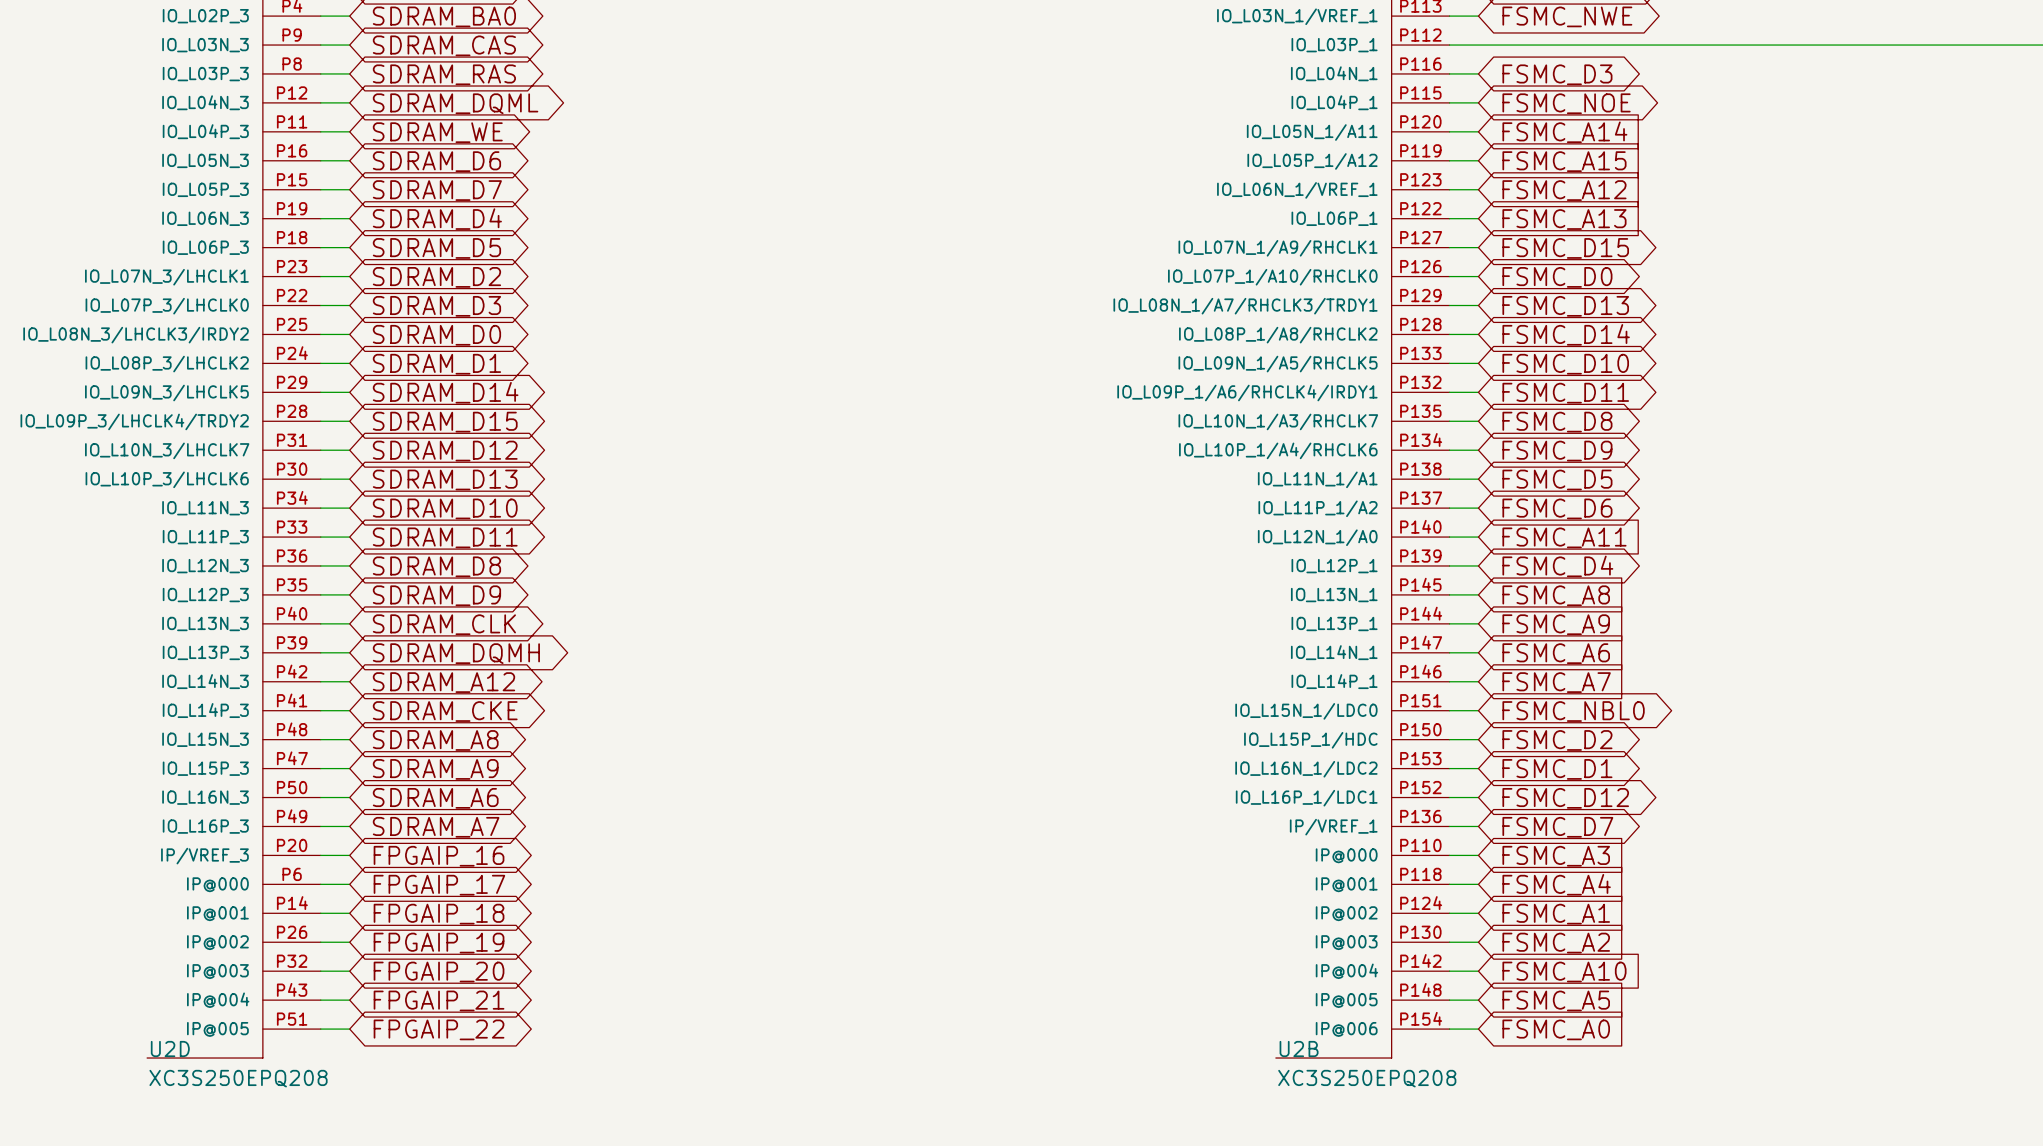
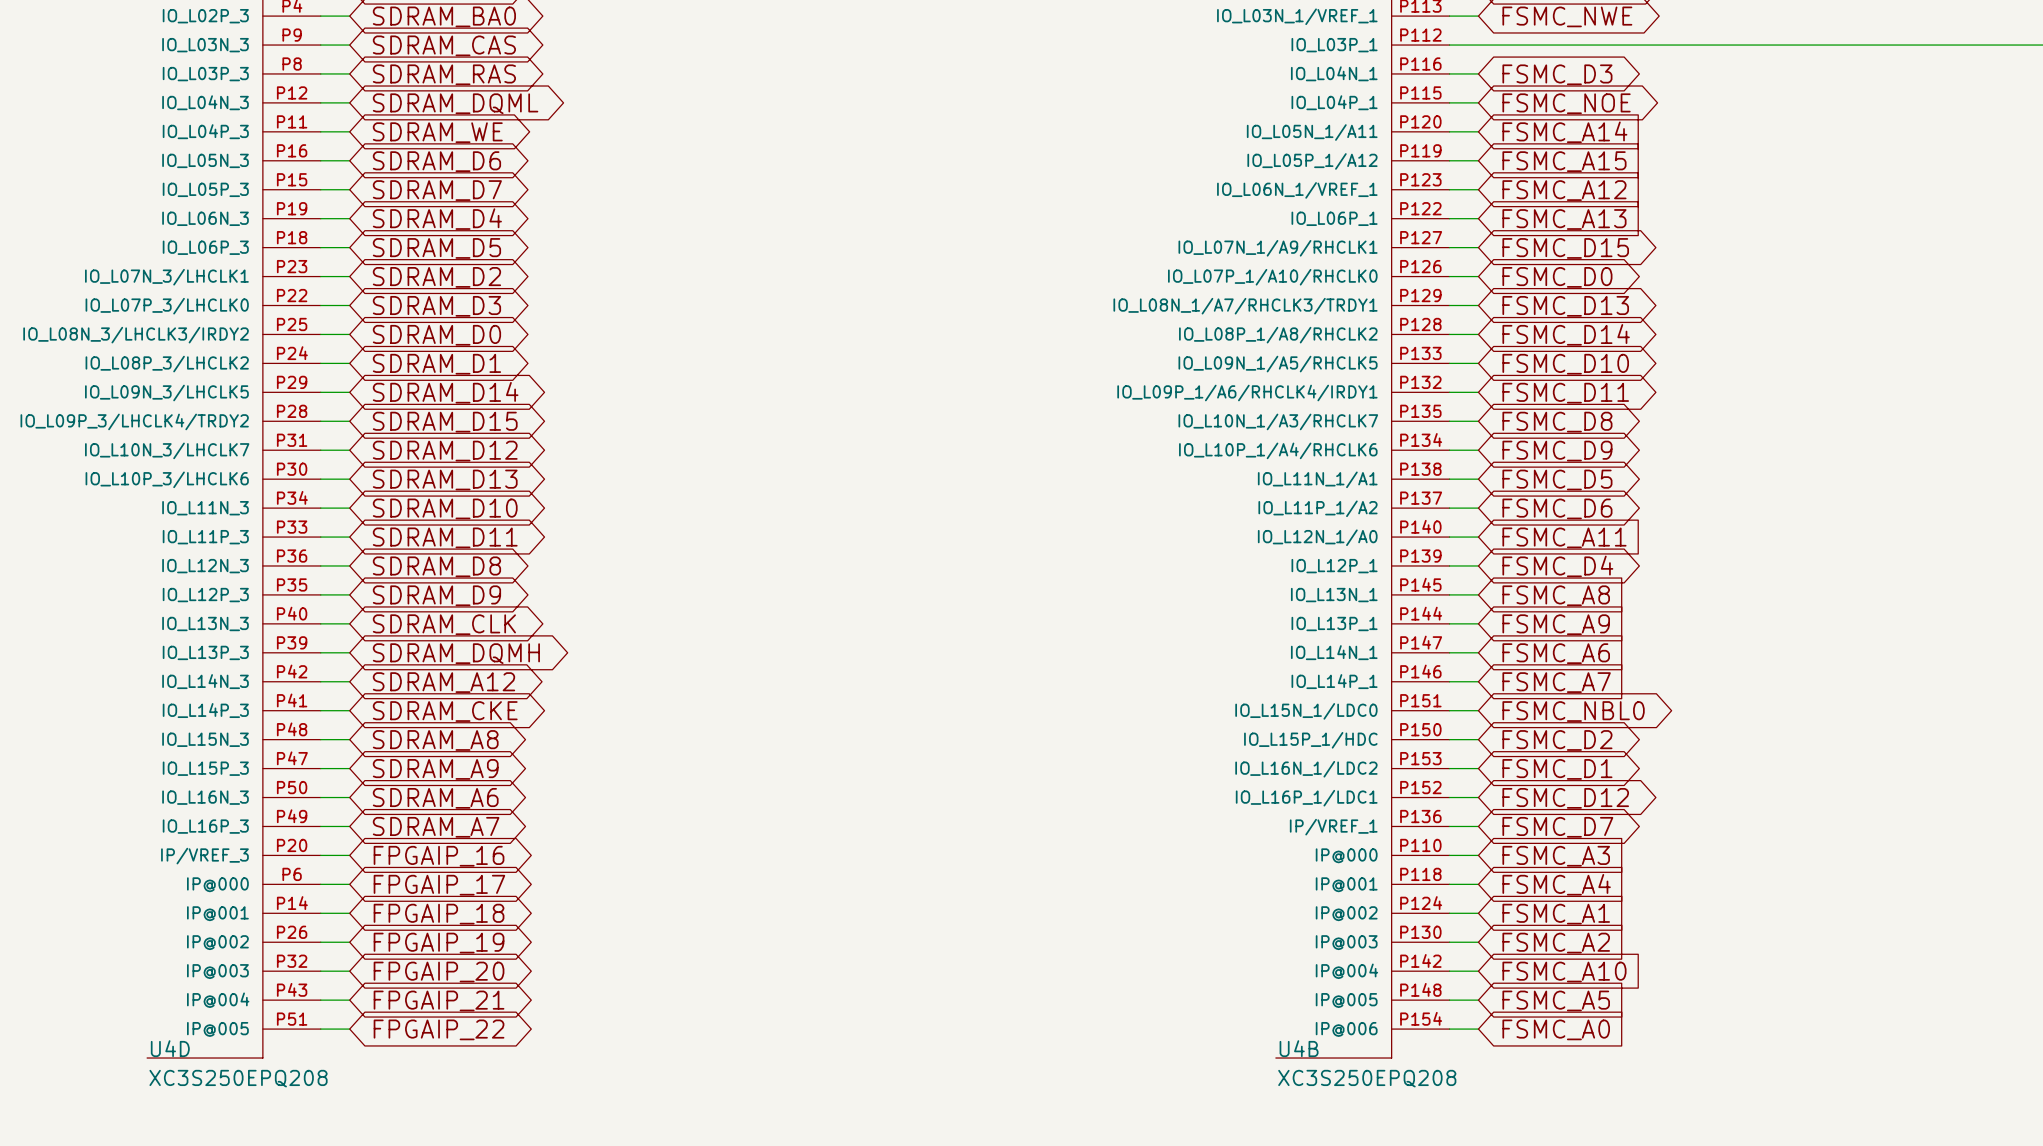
U2D name: U2D (170, 1049) -> U4D (170, 1048)
U2B name: U2B (1299, 1049) -> U4B (1299, 1048)

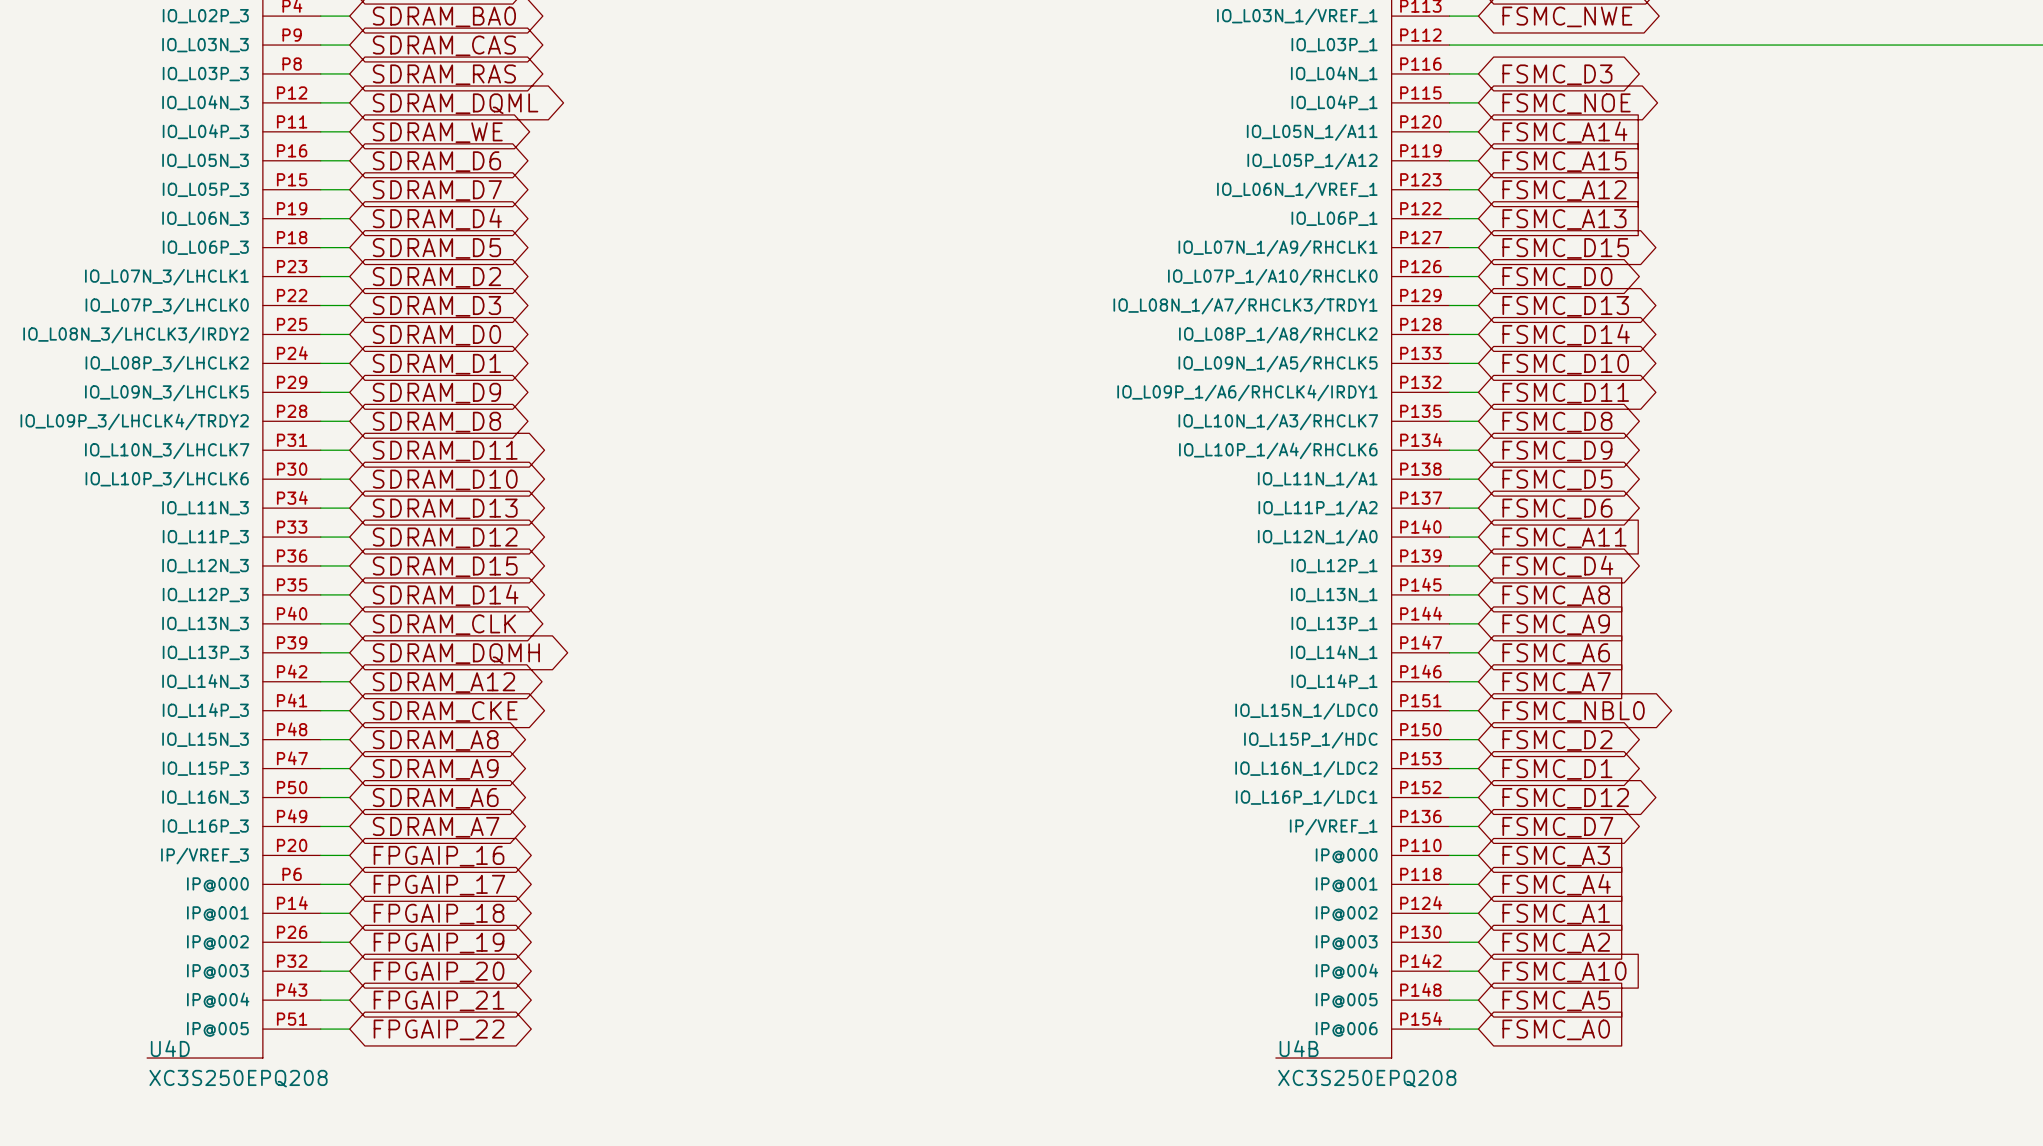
global label: SDRAM_D14 (445, 392) -> SDRAM_D9 (436, 393)
global label: SDRAM_D15 (445, 422) -> SDRAM_D8 (436, 422)
global label: SDRAM_D12 (445, 451) -> SDRAM_D11 (445, 451)
global label: SDRAM_D13 (445, 479) -> SDRAM_D10 (445, 479)
global label: SDRAM_D10 (445, 508) -> SDRAM_D13 (445, 508)
global label: SDRAM_D11 (445, 537) -> SDRAM_D12 (445, 537)
global label: SDRAM_D8 (436, 566) -> SDRAM_D15 (445, 566)
global label: SDRAM_D9 (436, 595) -> SDRAM_D14 (445, 595)

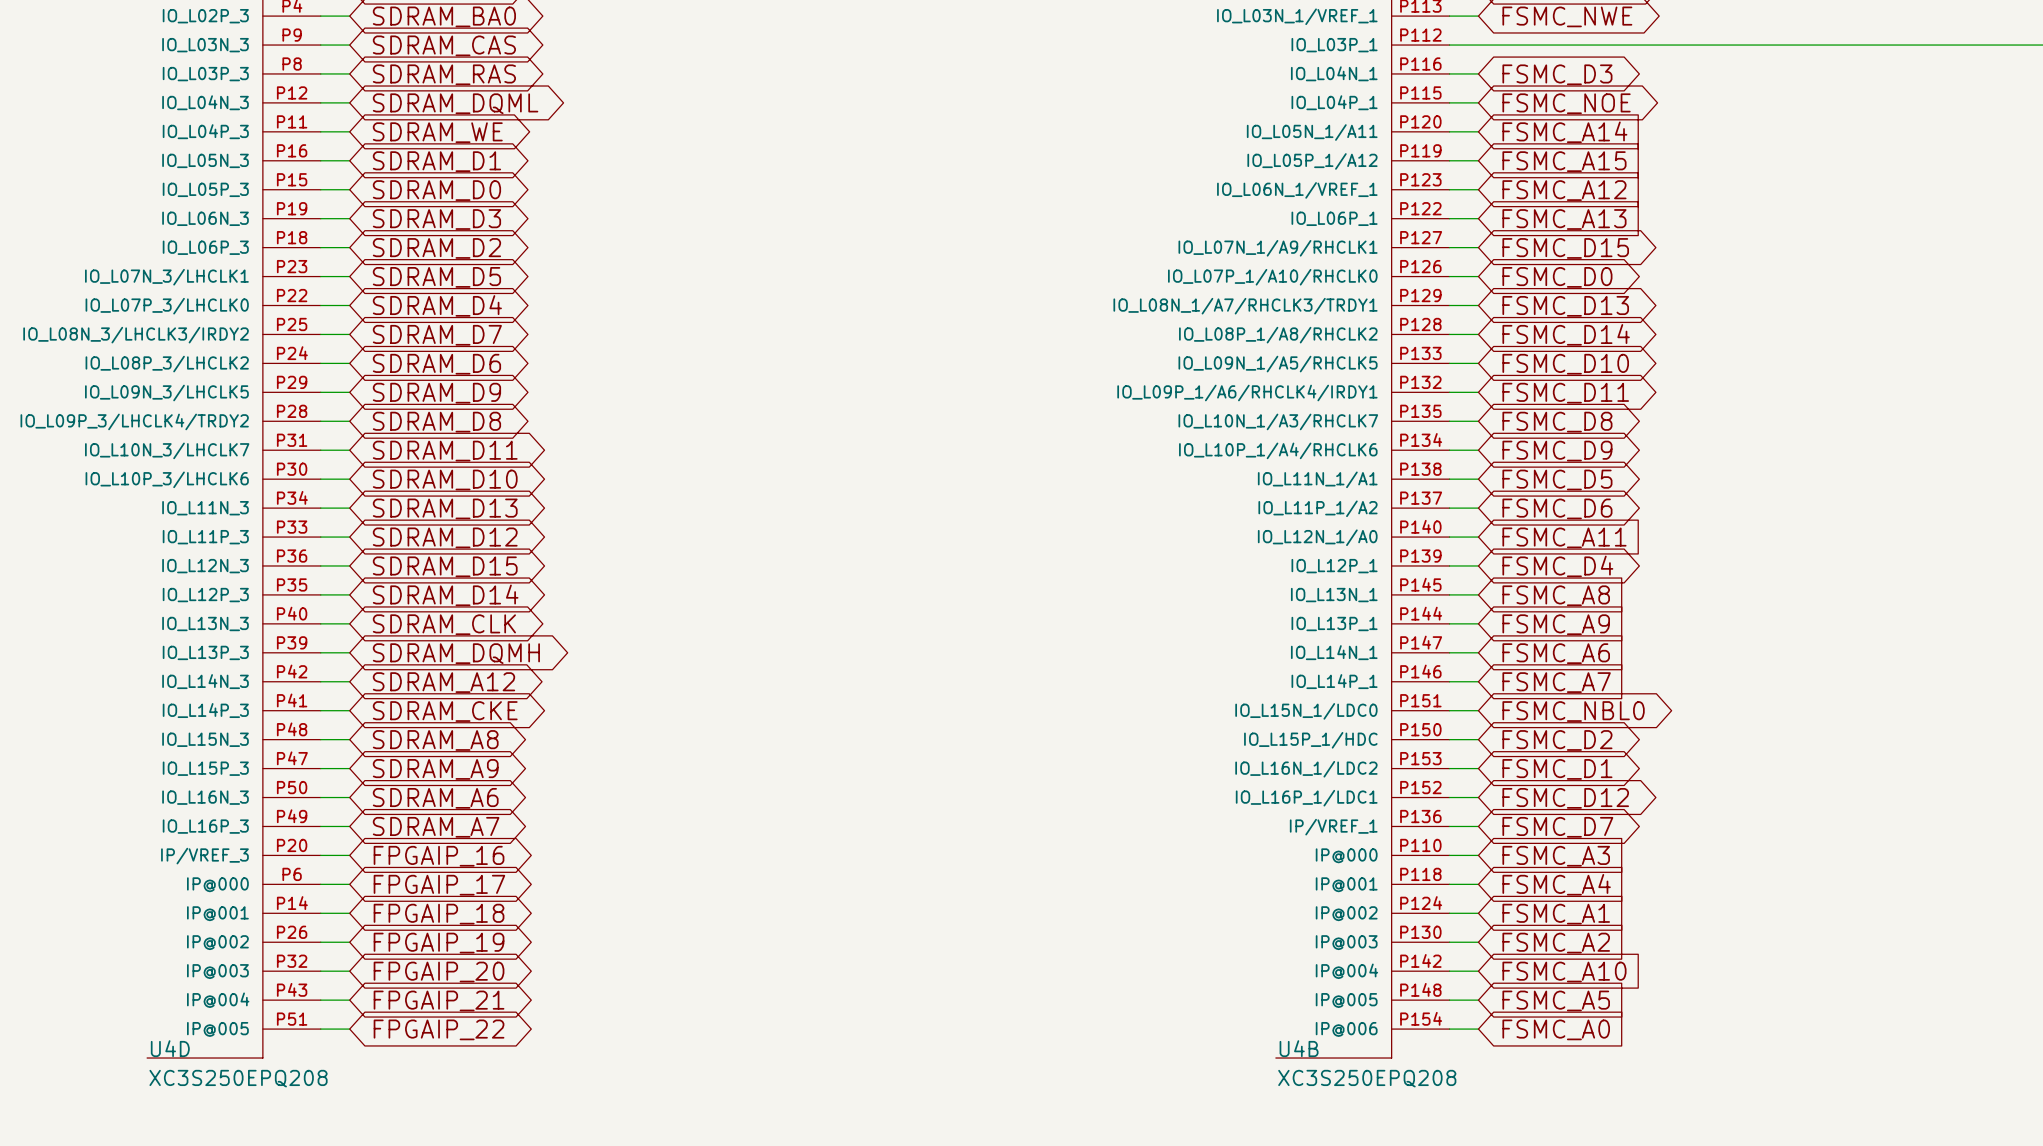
global label: SDRAM_D6 (436, 161) -> SDRAM_D1 (436, 161)
global label: SDRAM_D7 (437, 190) -> SDRAM_D0 (436, 190)
global label: SDRAM_D4 (437, 219) -> SDRAM_D3 (436, 219)
global label: SDRAM_D5 (436, 248) -> SDRAM_D2 (436, 248)
global label: SDRAM_D2 (436, 277) -> SDRAM_D5 (436, 277)
global label: SDRAM_D3 (436, 306) -> SDRAM_D4 (437, 305)
global label: SDRAM_D0 (436, 335) -> SDRAM_D7 (437, 335)
global label: SDRAM_D1 (436, 364) -> SDRAM_D6 (436, 364)

